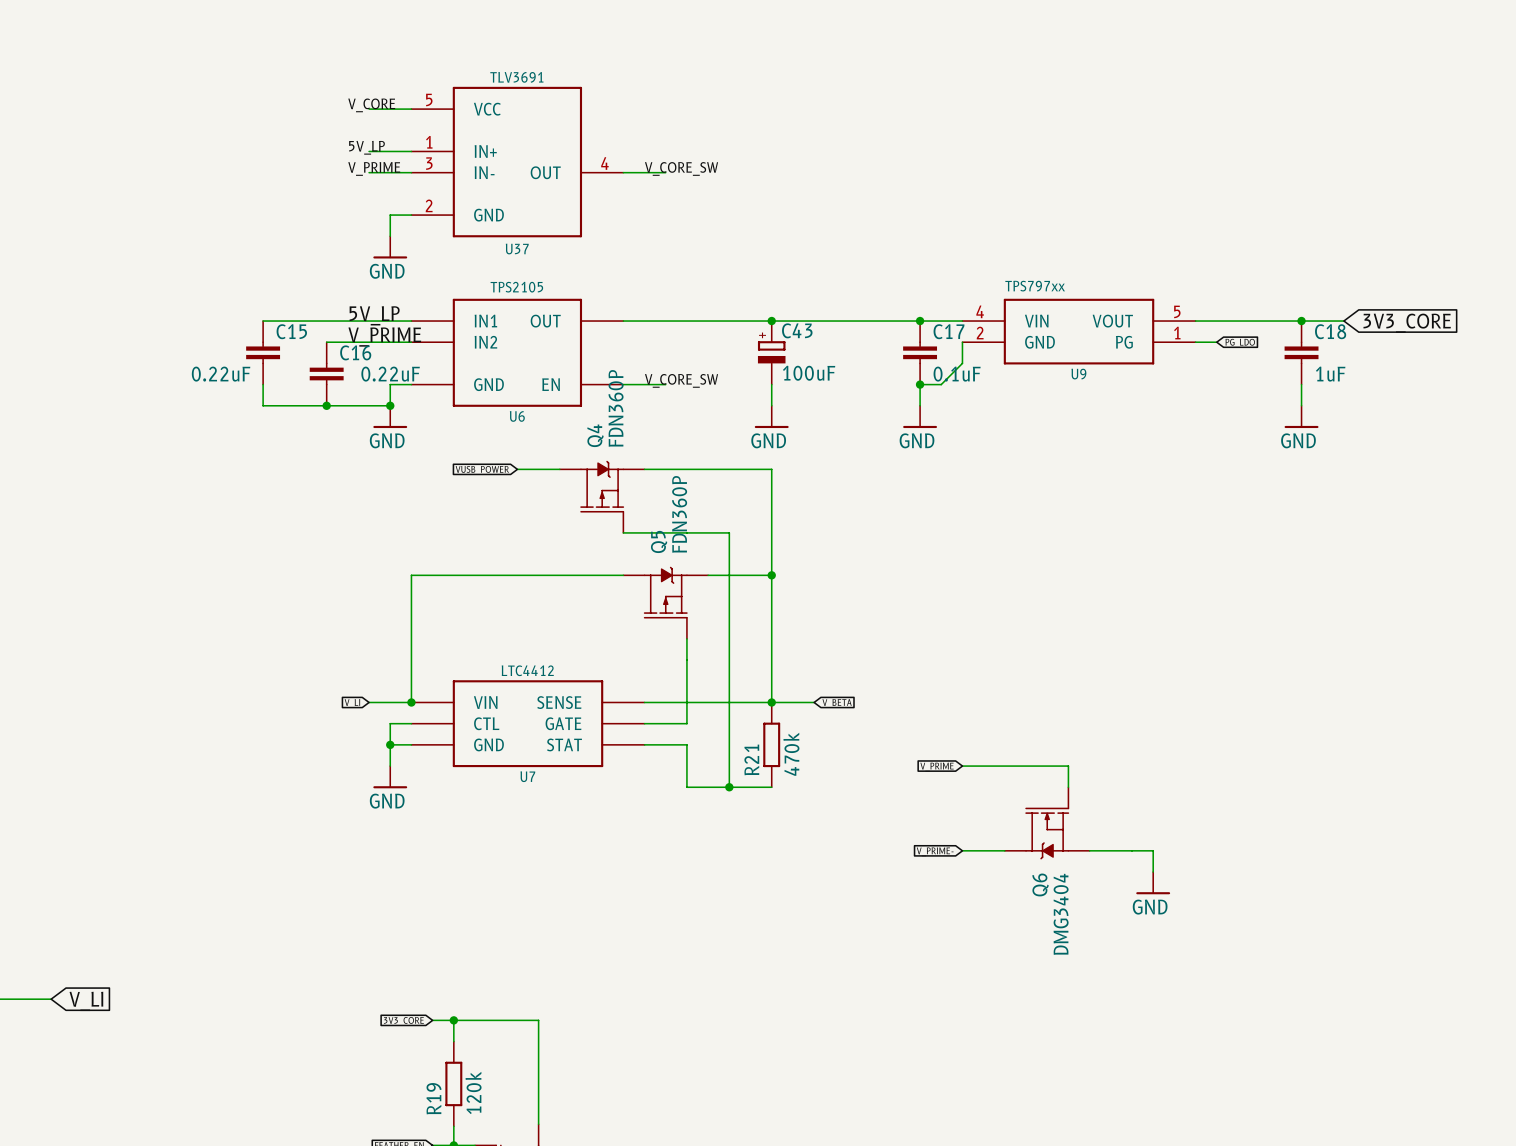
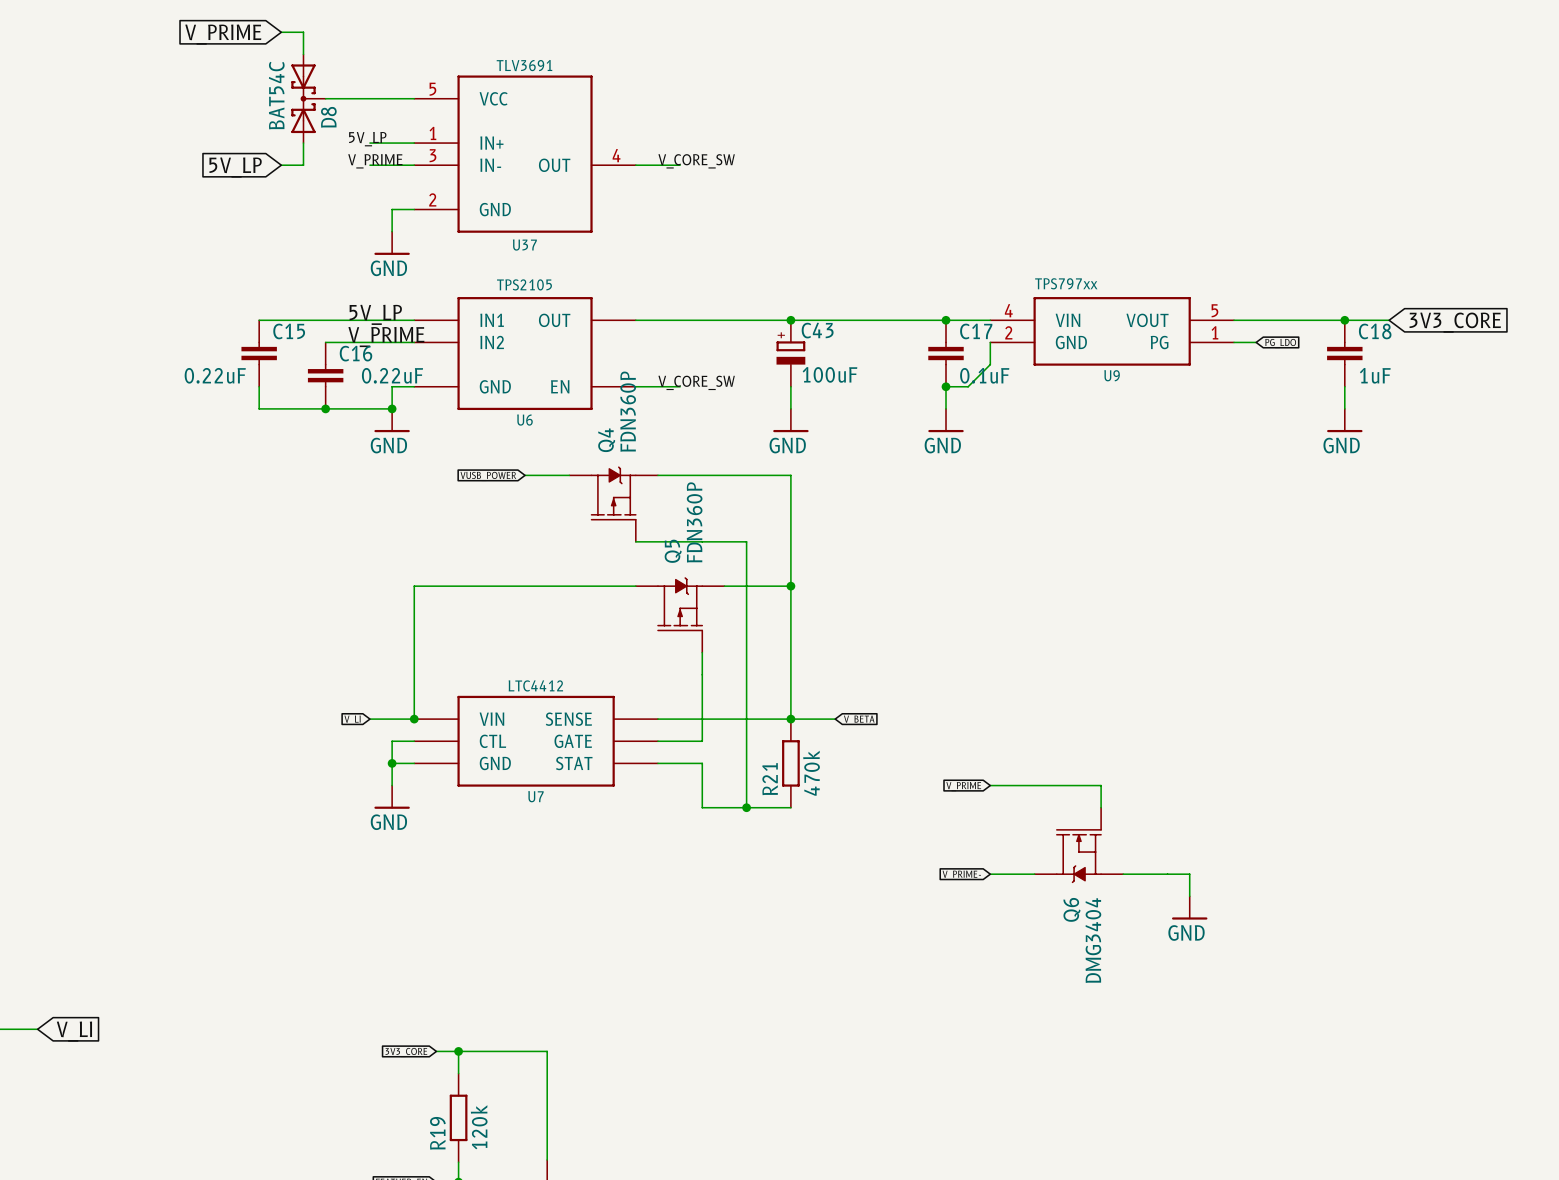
wire: none -> (281, 32) (303, 32) (303, 54)
global label: none -> V_PRIME (223, 34)
label: V_CORE (371, 105) -> none
D8: none -> BAT54C (308, 98)
wire: none -> (325, 98) (369, 98)
wire: none -> (303, 143) (303, 165) (281, 165)
global label: none -> 5V_LP (235, 167)

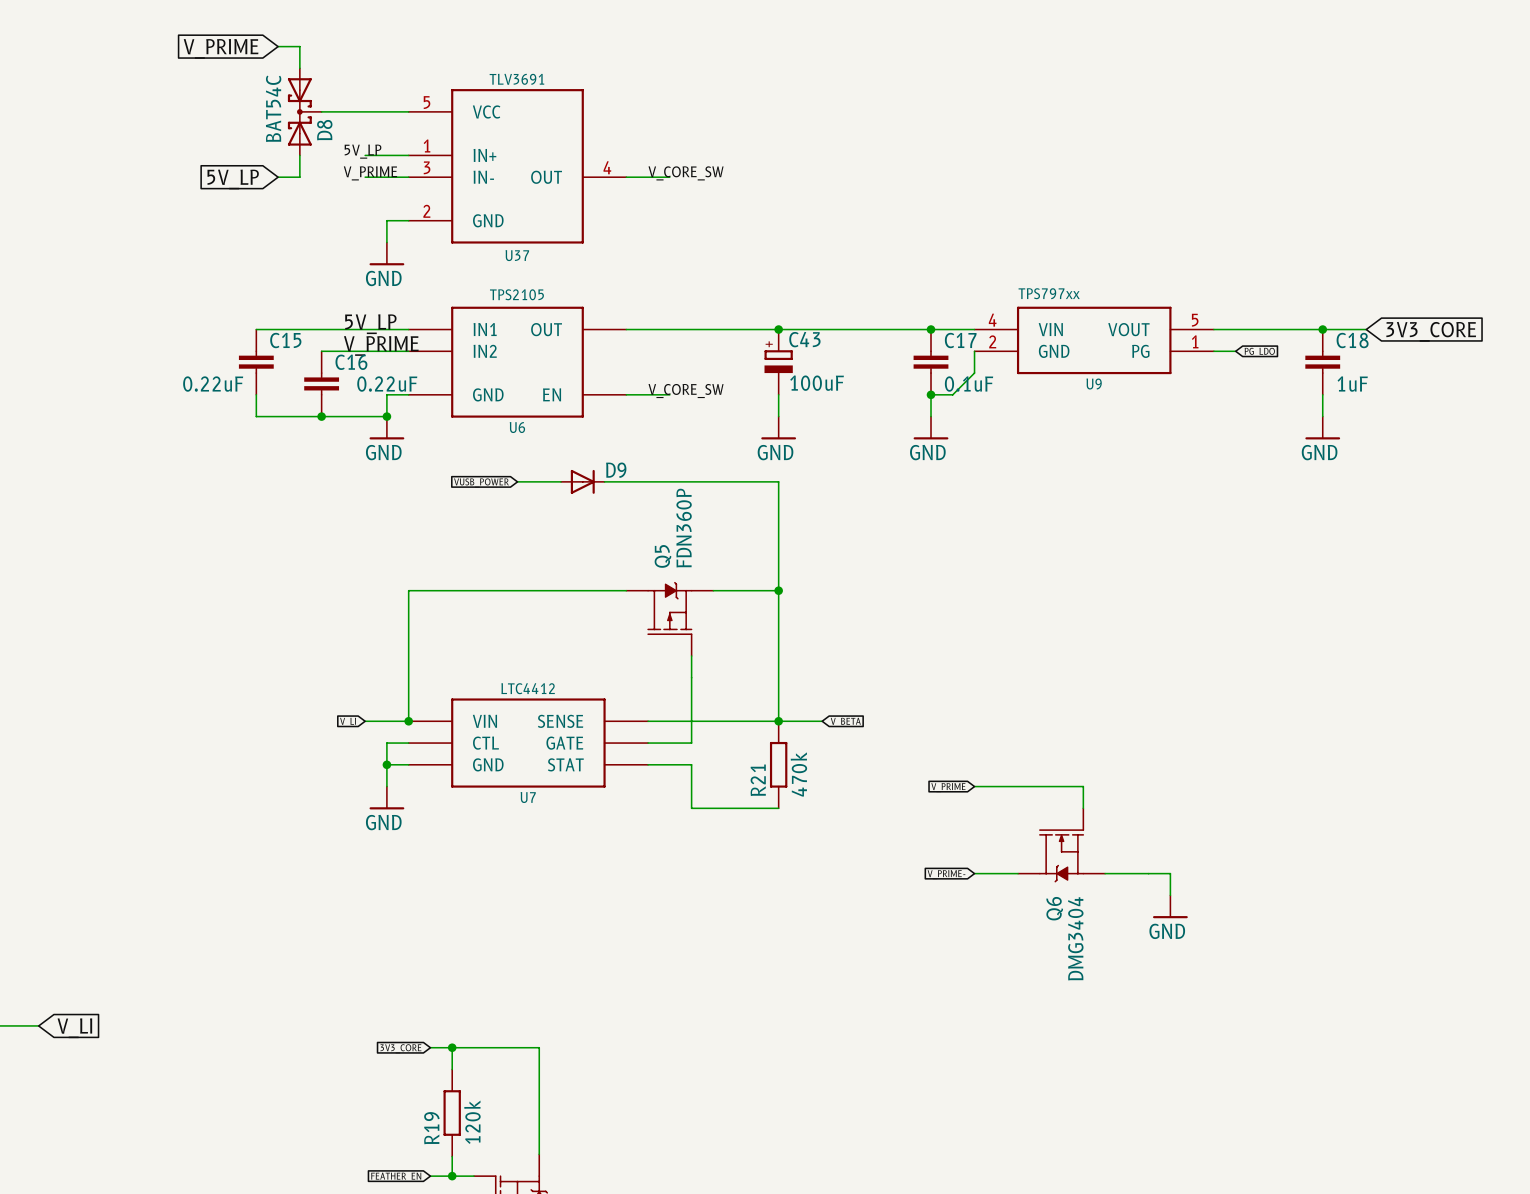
D9: none -> (582, 481)
Q4: FDN360P (613, 504) -> none
wire: (635, 541) (746, 541) (746, 807) -> none
junction: (746, 807) -> none

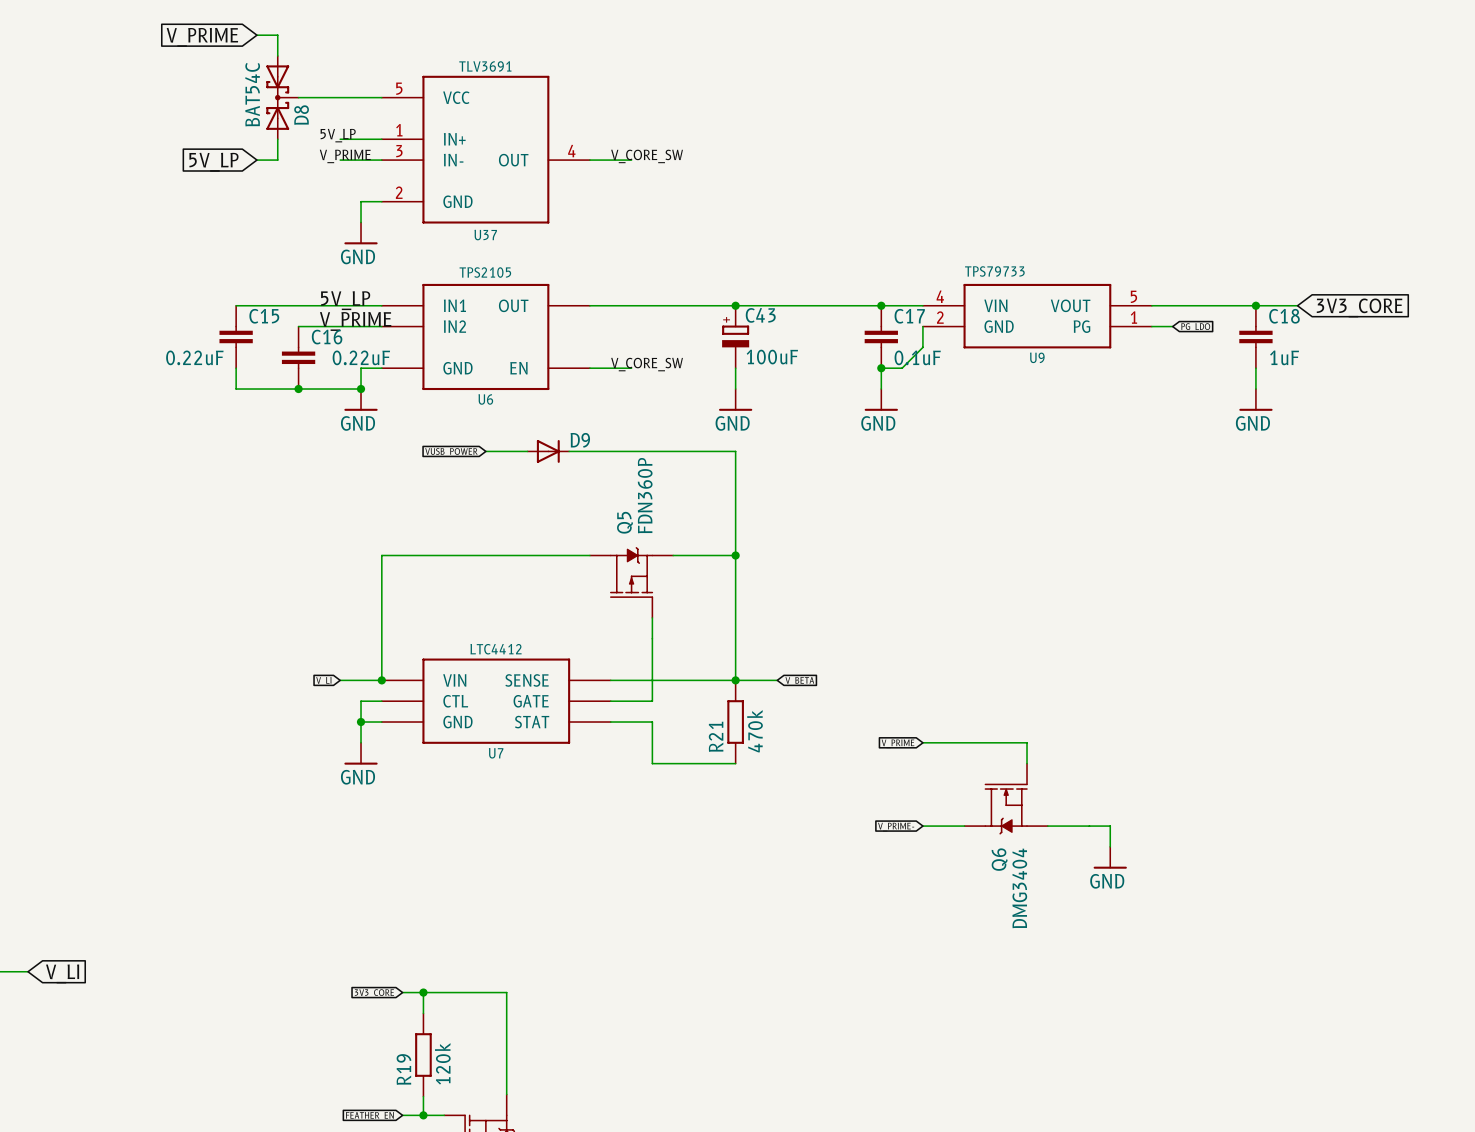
U9 text: TPS797xx (1049, 293) -> none
U9 text: none -> TPS79733 (994, 271)

